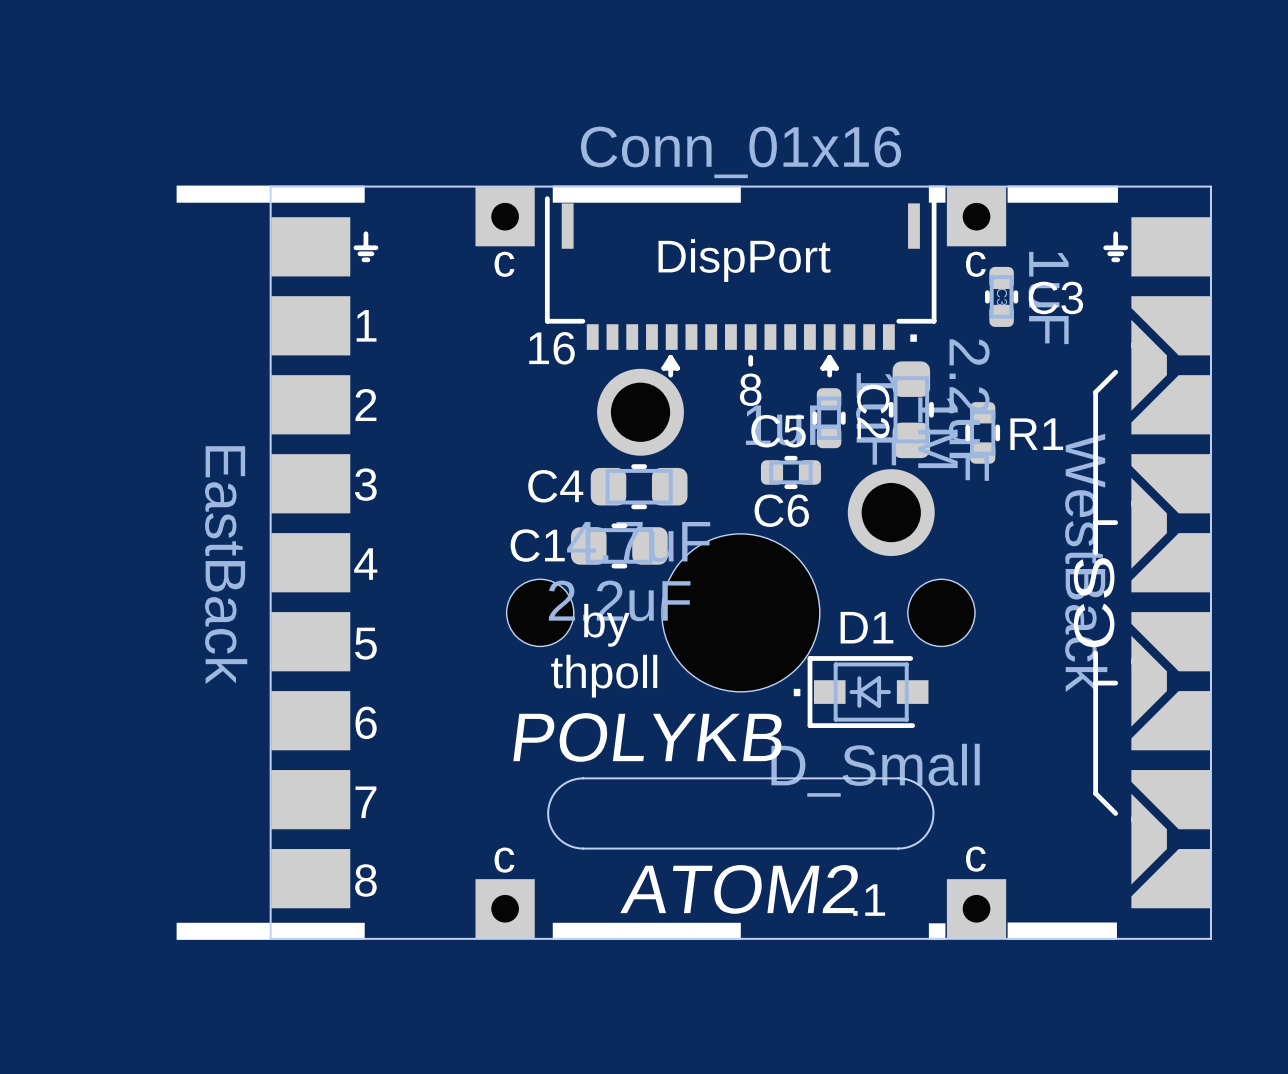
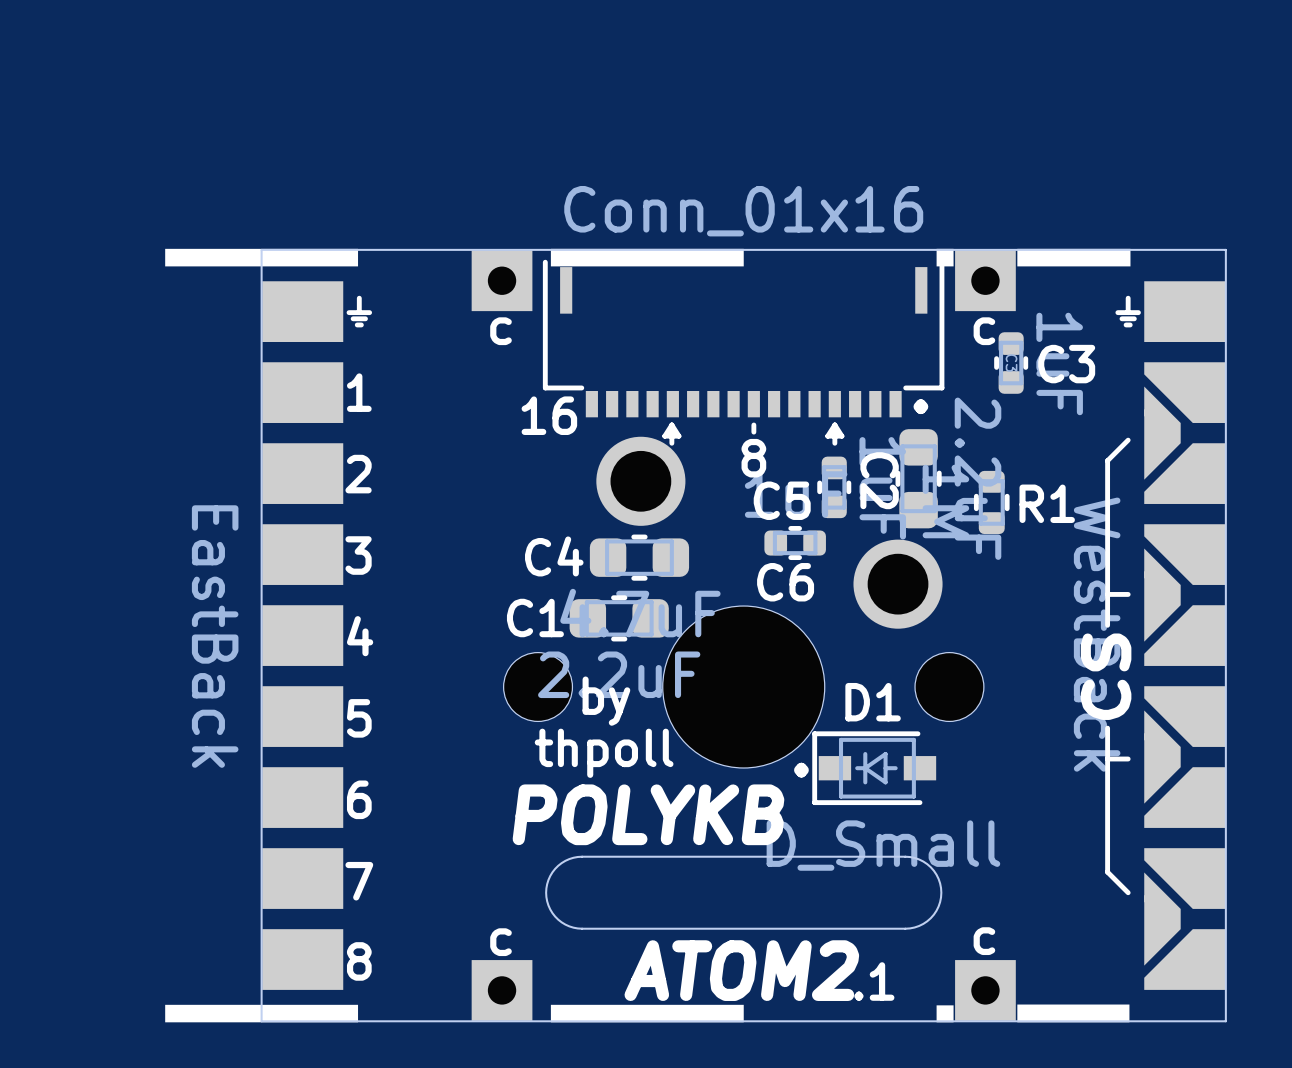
text: DispPort (744, 260) -> none

